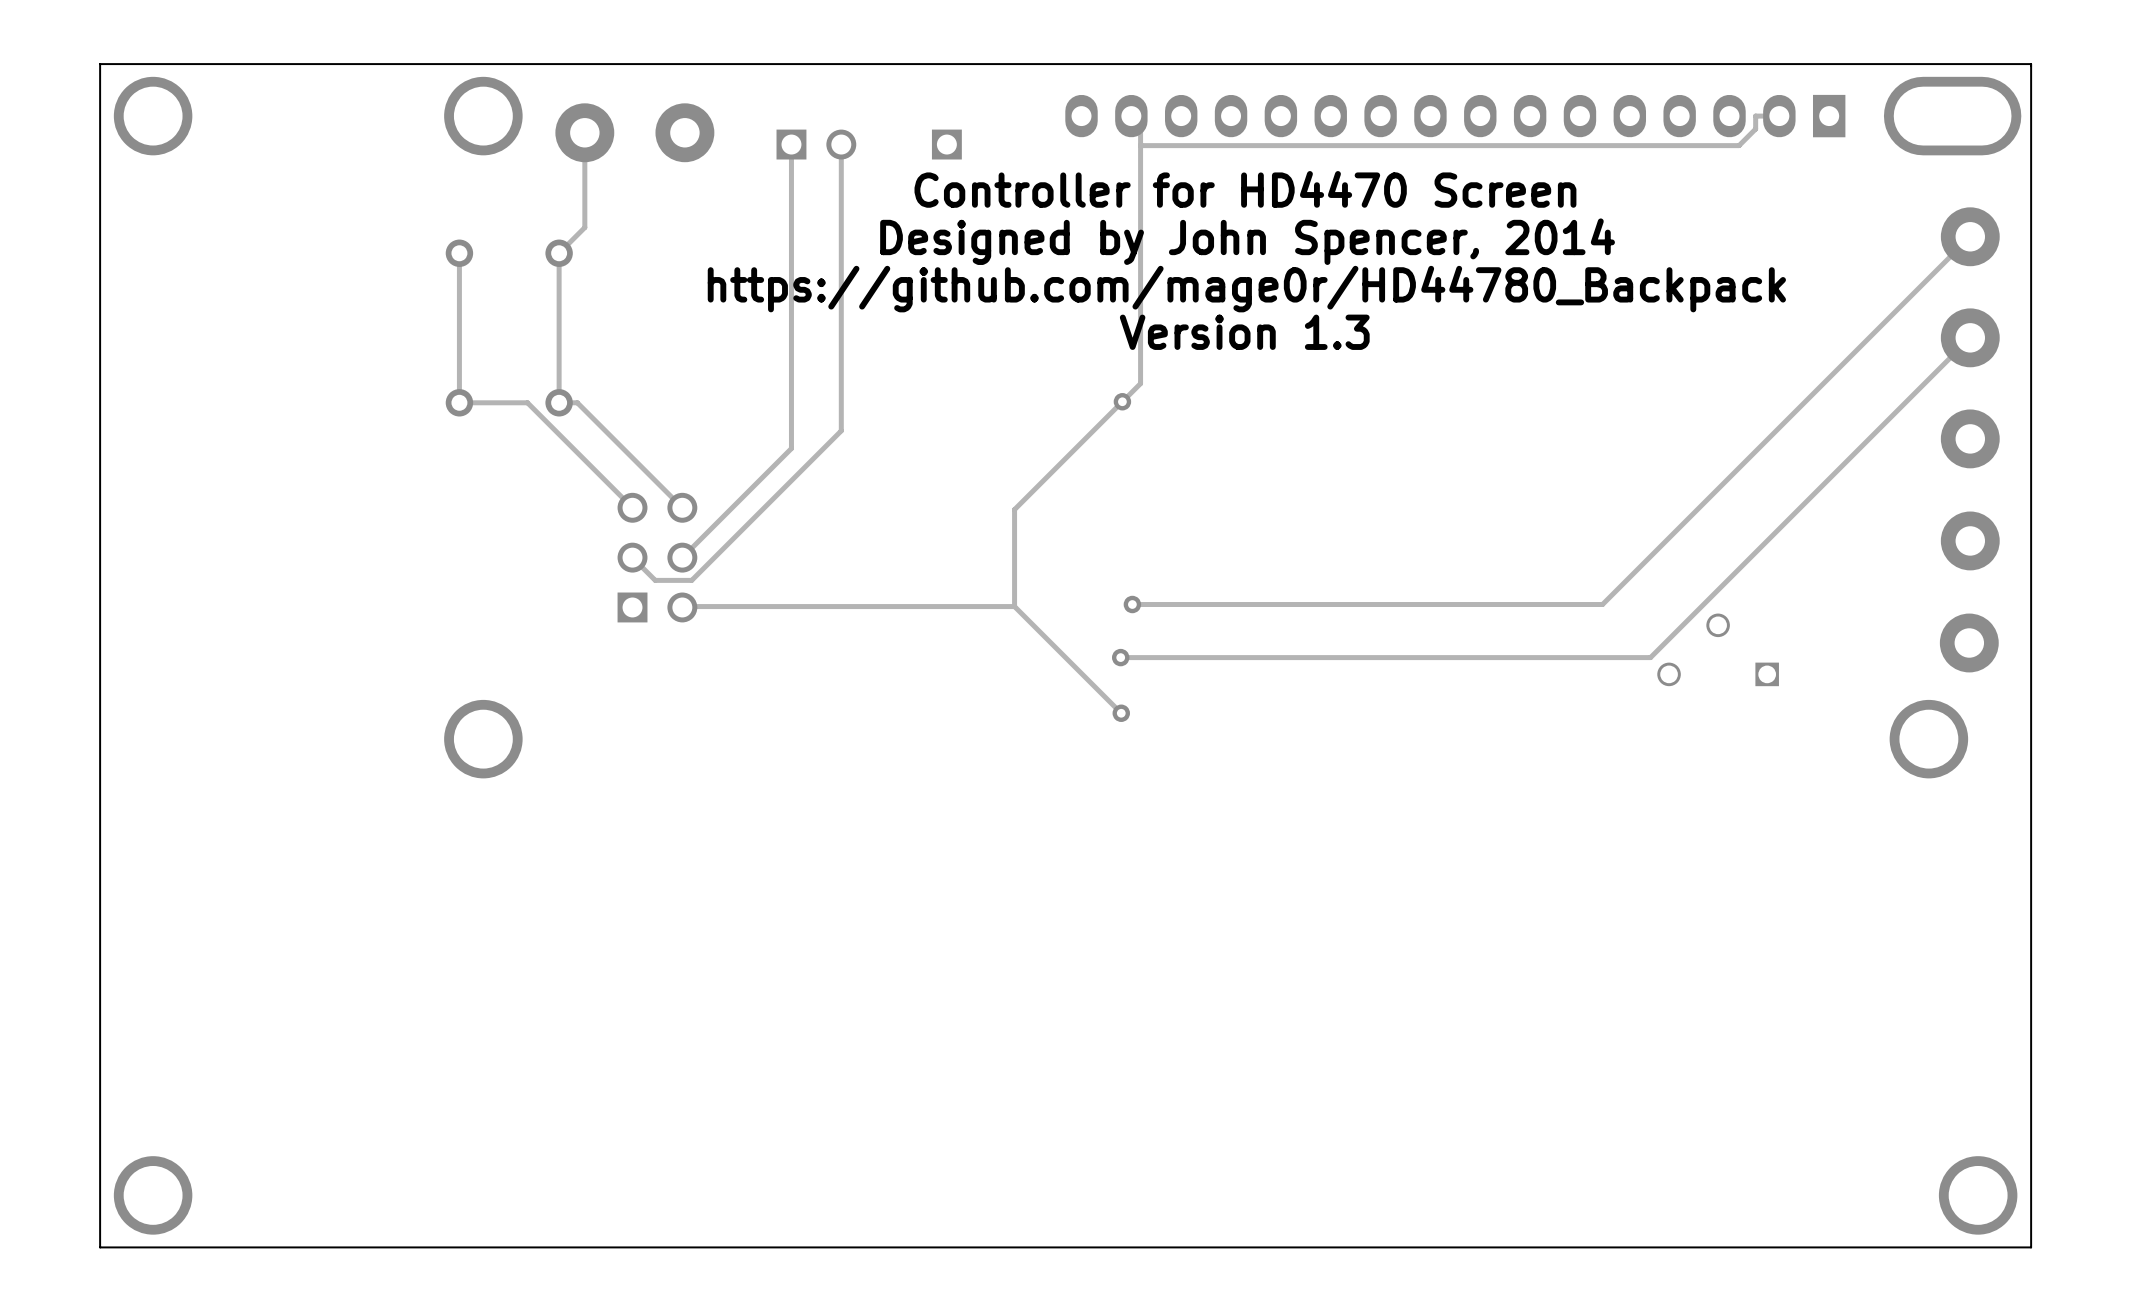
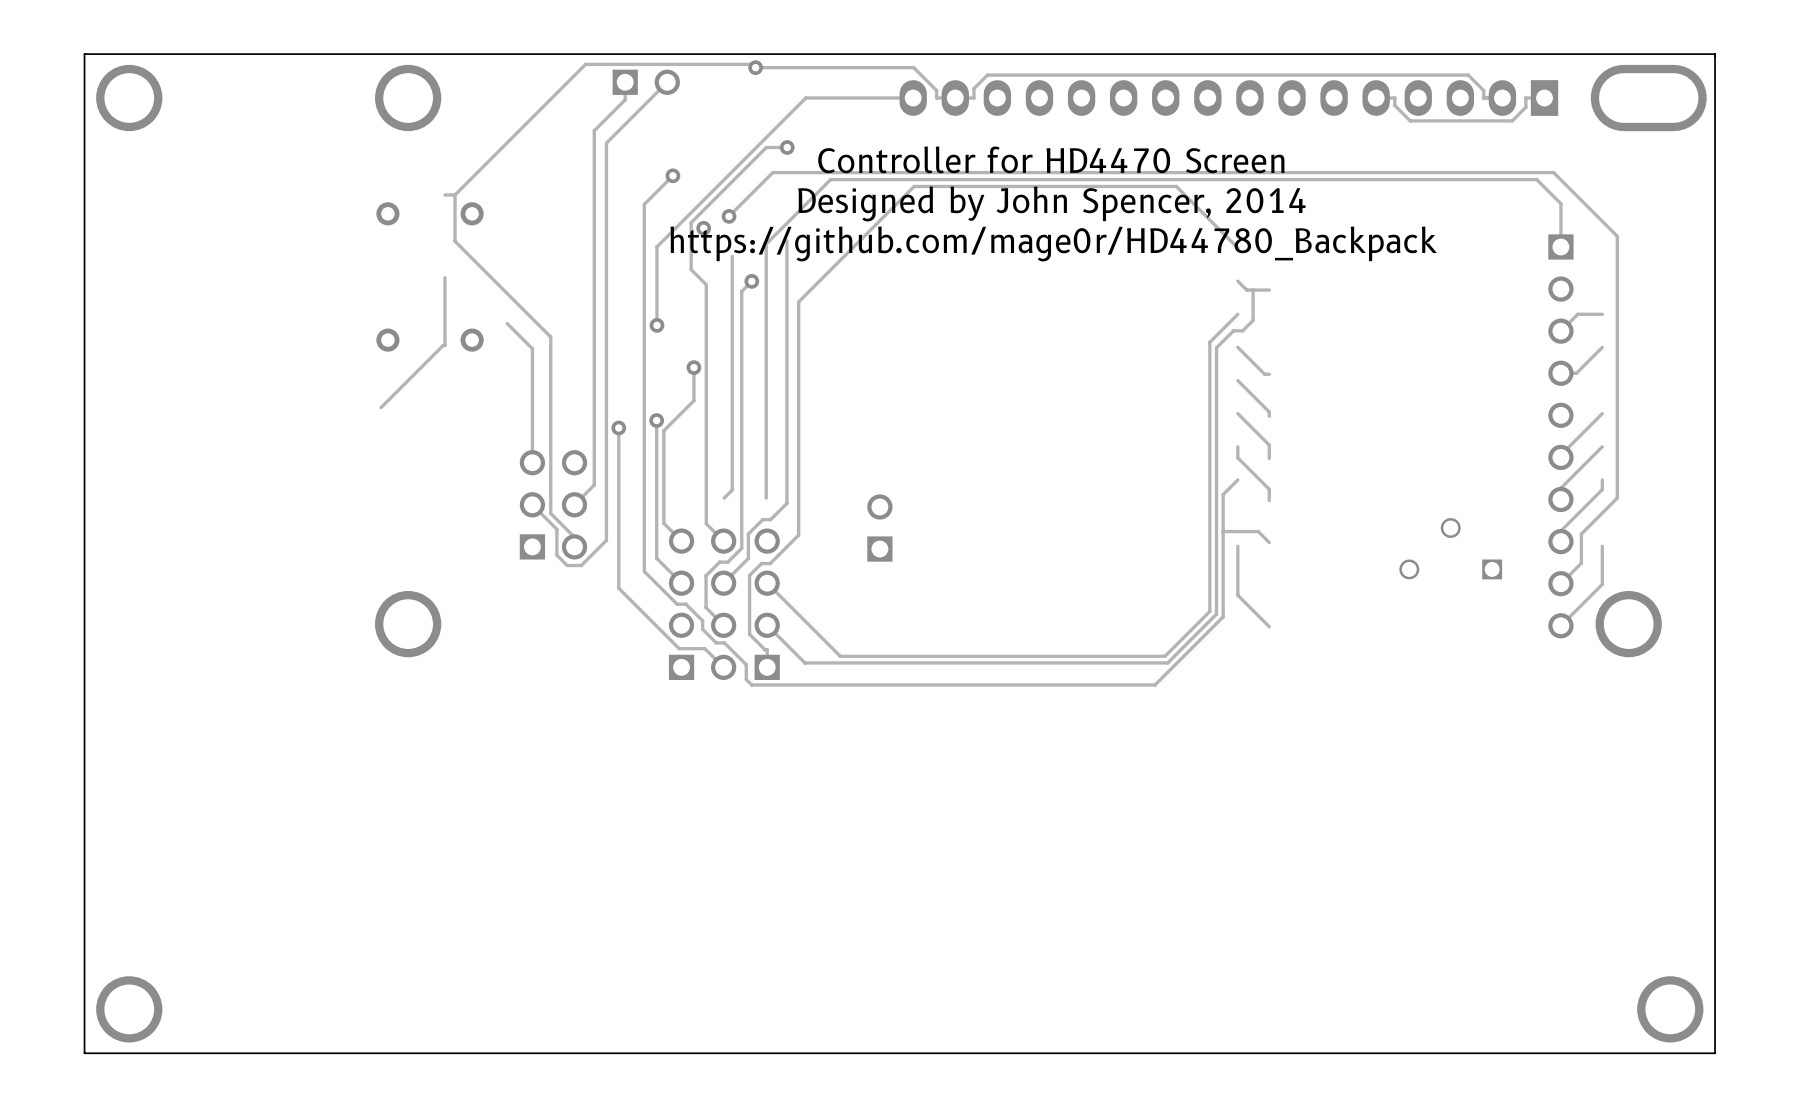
via: none -> (755, 67)
track: none -> (625, 82) (625, 99) (594, 130) (594, 485) (574, 504)
track: none -> (667, 82) (606, 143) (606, 540) (581, 565) (567, 565) (556, 555) (556, 529) (532, 504)
track: none -> (913, 98) (805, 98) (656, 246) (656, 325)
track: none -> (955, 98) (936, 98) (936, 90) (913, 67) (755, 67) (752, 64) (585, 64) (455, 194)
track: (1140, 116) (1140, 383) (1014, 509) (1014, 606) -> none
track: (1757, 116) (1755, 116) (1755, 129) (1739, 145) (1140, 145) -> (1483, 98) (1483, 90) (1468, 75) (987, 75) (973, 88) (973, 98) (963, 98)
track: none -> (1544, 98) (1525, 98) (1525, 107) (1512, 120) (1410, 120) (1394, 105) (1394, 98) (1376, 98)
track: (584, 132) (584, 227) (559, 253) (559, 402) (577, 402) (682, 507) -> none
part: (584, 132) -> none
part: (684, 132) -> none
track: (791, 144) (791, 448) (682, 557) -> none
part position: (816, 144) -> (646, 82)
track: (841, 144) (841, 430) (691, 580) (655, 580) (632, 557) -> none
part: (946, 144) -> none
track: none -> (787, 147) (766, 147) (691, 222) (691, 269) (706, 284) (706, 523) (723, 541)
via: none -> (787, 147)
track: none -> (672, 175) (644, 204) (644, 571) (677, 604) (686, 604) (702, 620) (702, 629) (716, 642) (724, 642) (746, 664) (746, 679) (751, 684) (1155, 684) (1223, 616) (1223, 494) (1237, 479)
via: none -> (672, 175)
track: none -> (455, 194) (444, 194)
track: none -> (455, 194) (455, 241) (550, 337) (550, 513) (574, 537) (574, 546)
track: (1970, 236) (1602, 604) (1132, 604) -> none
part: (1970, 236) -> none
track: (459, 253) (459, 402) (527, 402) (632, 507) -> none
track: none -> (729, 216) (772, 172) (1553, 172) (1617, 236) (1617, 498) (1581, 533) (1581, 563) (1560, 583)
via: none -> (729, 216)
via: none -> (703, 228)
track: none -> (786, 240) (786, 503) (770, 519) (762, 519) (748, 534) (748, 558) (723, 583)
track: none -> (1560, 246) (1560, 203) (1536, 179) (830, 179) (766, 244) (766, 498)
track: none -> (1237, 247) (1176, 186) (914, 186) (798, 302) (798, 535) (770, 563) (761, 563) (749, 575) (749, 634) (767, 649) (767, 667)
track: none -> (732, 256) (732, 490) (724, 498)
track: none -> (444, 277) (444, 345) (380, 407)
text: Version 1.3 (1244, 332) -> none
track: none -> (1237, 281) (1246, 290) (1269, 290)
track: none -> (751, 281) (741, 291) (741, 548) (727, 562) (719, 562) (706, 575) (706, 607) (723, 625)
via: none -> (751, 281)
track: (1970, 337) (1650, 657) (1120, 657) -> none
part: (1970, 337) -> none
track: none -> (1253, 290) (1253, 320) (1242, 330) (1233, 330) (1216, 347) (1216, 614) (1167, 662) (804, 662) (767, 625)
track: none -> (1237, 314) (1209, 342) (1209, 611) (1164, 656) (840, 656) (767, 583)
track: none -> (1602, 314) (1577, 314) (1560, 331)
track: none -> (507, 323) (532, 348) (532, 462)
via: none -> (656, 325)
via: (1122, 401) -> none
track: none -> (1237, 347) (1264, 374) (1269, 374)
track: none -> (1602, 347) (1576, 373) (1560, 373)
track: none -> (693, 367) (693, 400) (663, 430) (663, 523) (681, 541)
via: none -> (693, 367)
part: (1970, 438) -> none
track: none -> (1237, 380) (1269, 412) (1269, 416)
track: none -> (1237, 413) (1269, 445) (1269, 458)
track: none -> (1602, 413) (1560, 455) (1560, 457)
track: none -> (656, 420) (656, 558) (681, 583)
via: none -> (656, 420)
track: none -> (618, 428) (618, 588) (679, 648) (704, 648) (723, 667)
via: none -> (618, 428)
part: none -> (1560, 436)
track: none -> (1237, 446) (1237, 457) (1269, 489) (1269, 500)
track: none -> (1602, 446) (1560, 488) (1560, 499)
part: (1970, 540) -> none
part position: (657, 557) -> (553, 504)
track: none -> (1602, 479) (1602, 489) (1560, 530) (1560, 541)
via: (1132, 604) -> none
track: (1014, 606) (682, 607) -> none
track: (1014, 606) (1121, 713) -> none
part: none -> (879, 528)
track: none -> (1223, 531) (1258, 531) (1269, 542)
part: (1969, 642) -> none
track: none -> (1237, 546) (1237, 595) (1269, 626)
track: none -> (1602, 546) (1602, 584) (1560, 625)
via: (1120, 657) -> none
via: (1121, 713) -> none
part: none -> (702, 604)
part: none -> (767, 604)

